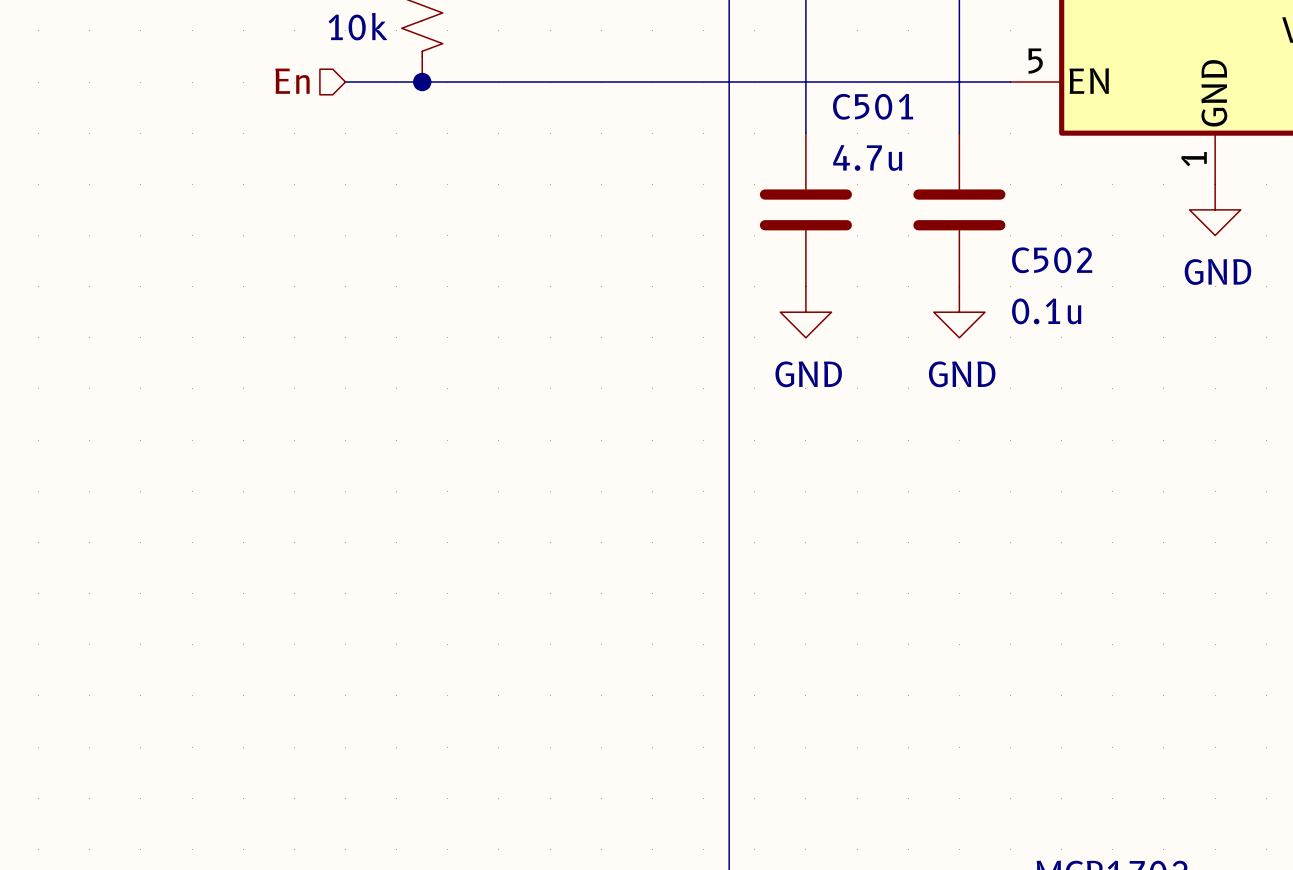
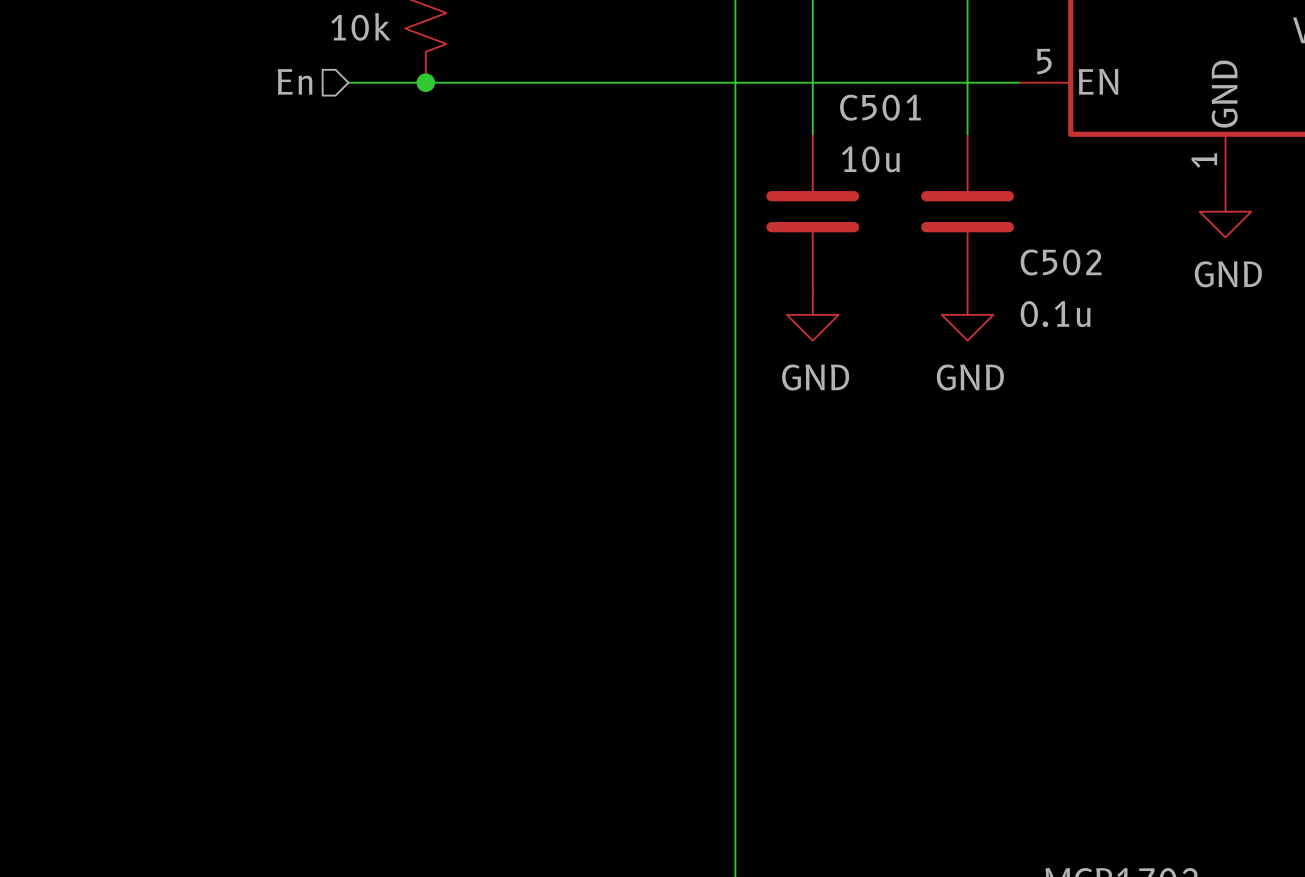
C501 value: 4.7u (867, 157) -> 10u (870, 159)

